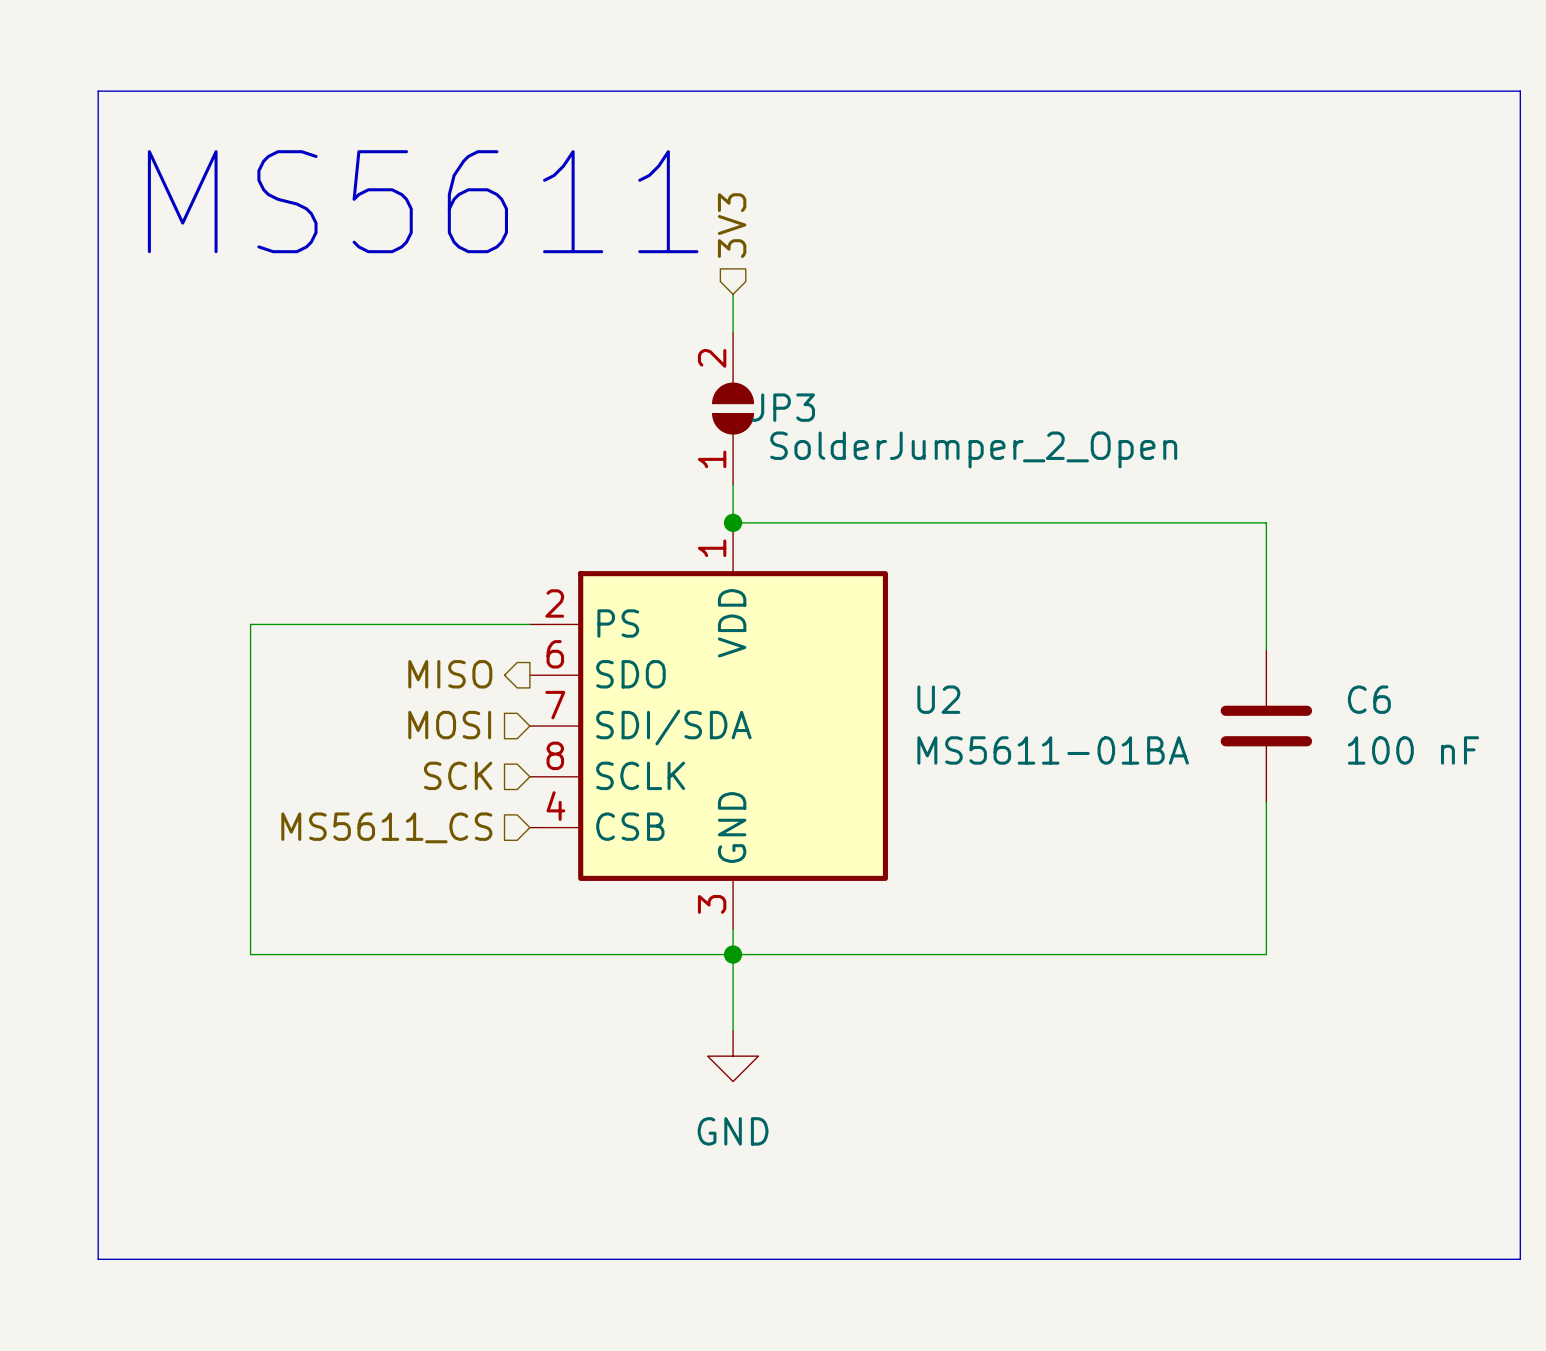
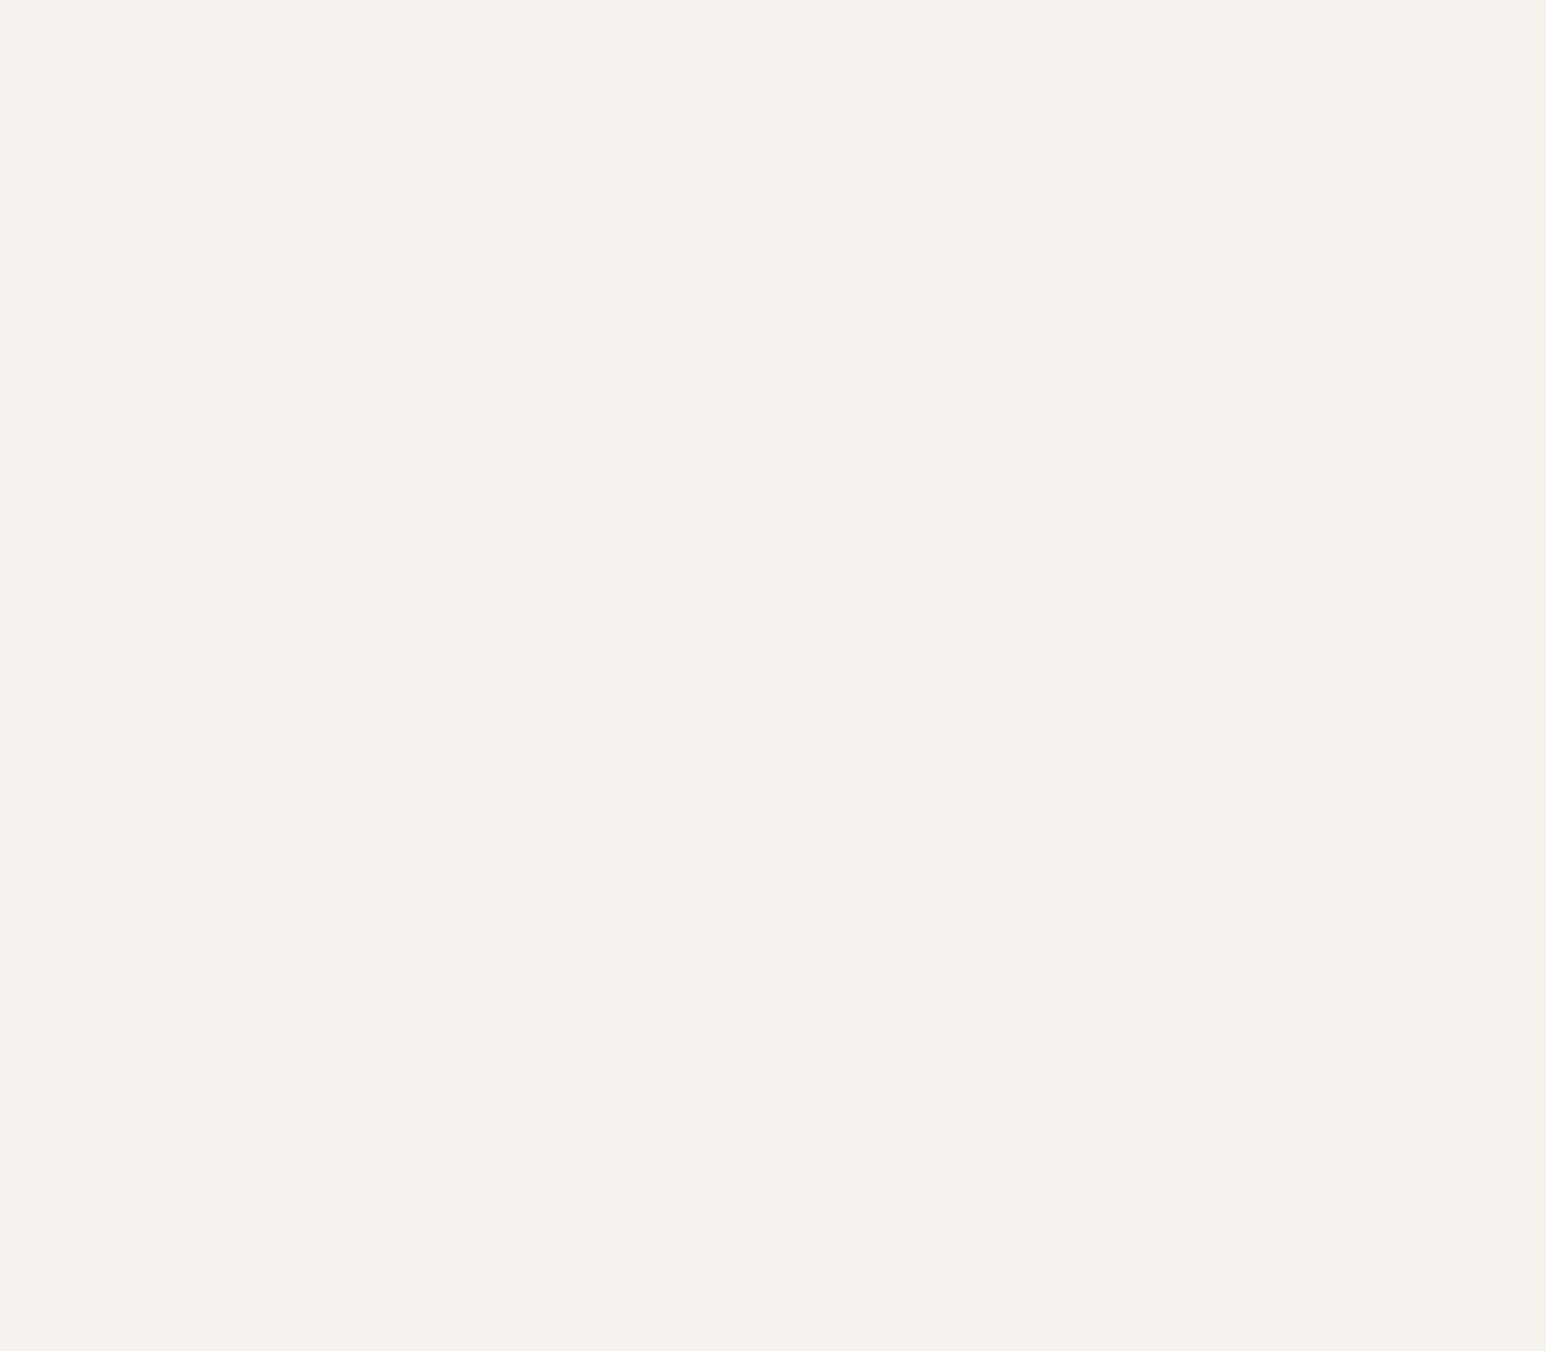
line: (98, 91) (98, 1259) (1520, 1259) (1520, 91) (98, 91) -> none
text: MS5611 (423, 201) -> none
hierarchical label: 3V3 (732, 225) -> none
wire: (733, 294) (733, 332) -> none
JP3: SolderJumper_2_Open (733, 408) -> none
wire: (733, 484) (733, 522) (1266, 522) (1266, 649) -> none
junction: (733, 522) -> none
wire: (529, 624) (250, 624) (250, 954) (1266, 954) (1266, 802) -> none
hierarchical label: MISO (450, 674) -> none
hierarchical label: MOSI (449, 725) -> none
U2: MS5611-01BA (708, 726) -> none
C6: 100 nF (1266, 726) -> none
hierarchical label: SCK (458, 775) -> none
hierarchical label: MS5611_CS (386, 827) -> none
wire: (733, 929) (733, 1030) -> none
junction: (733, 954) -> none
power symbol: GND (733, 1056) -> none

